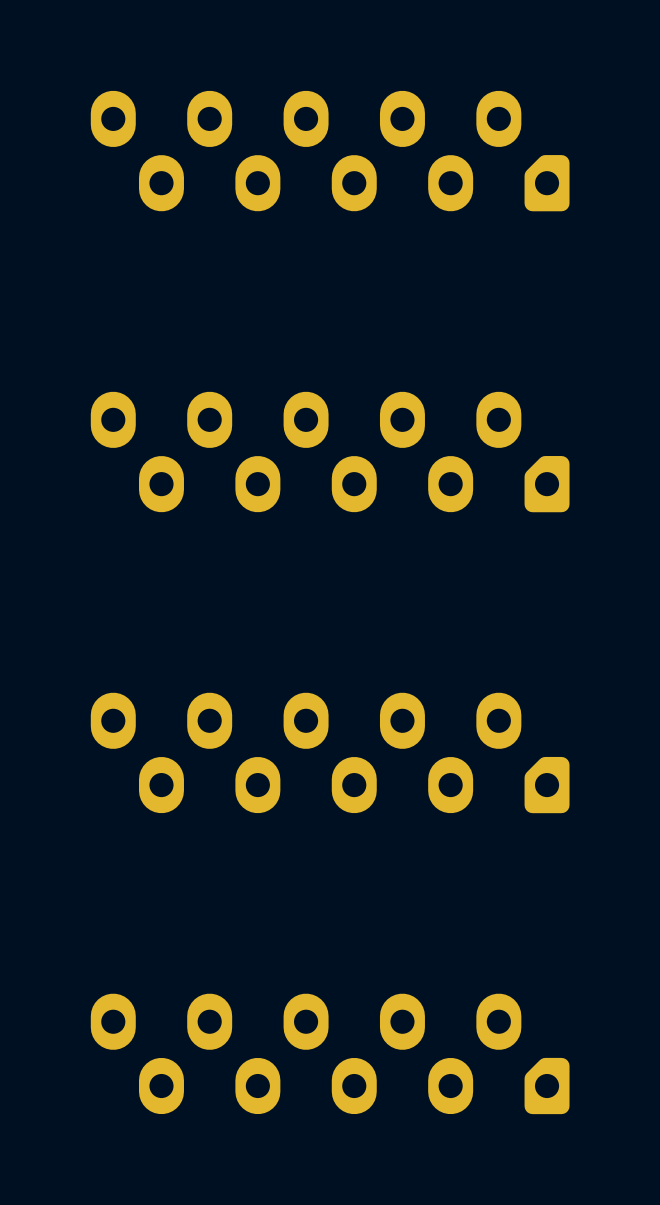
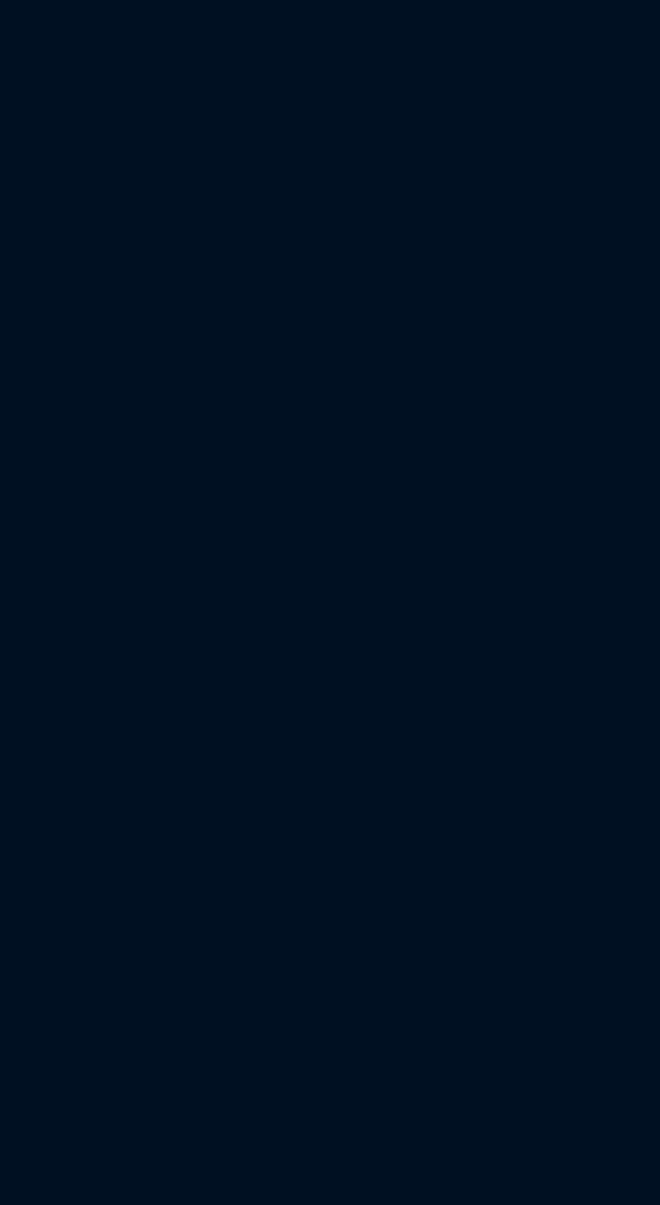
part: (330, 151) -> none
part: (330, 451) -> none
part: (330, 752) -> none
part: (330, 1053) -> none

